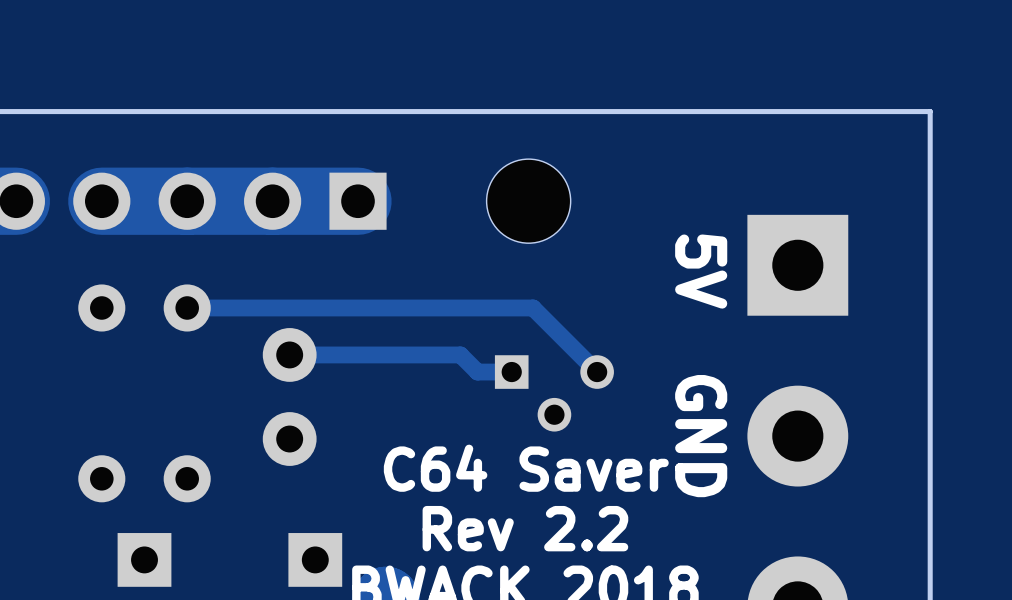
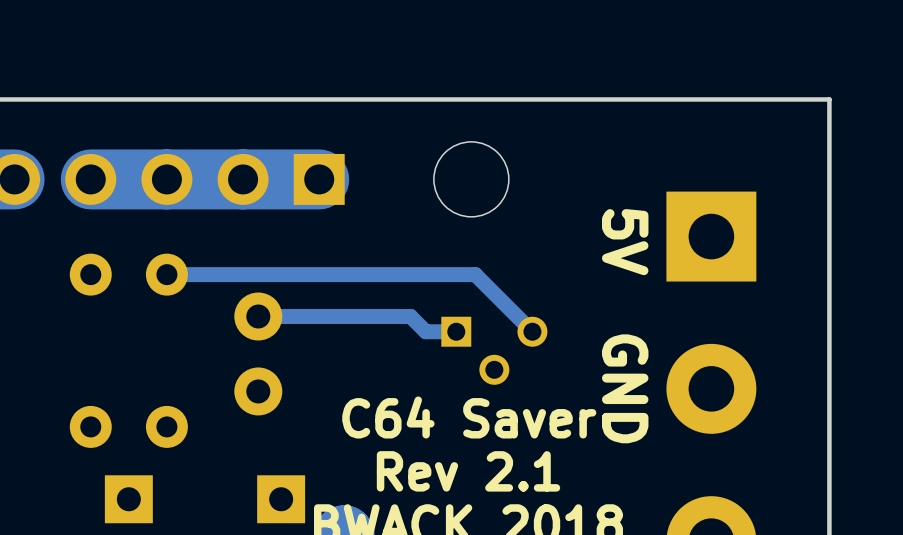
text: Rev 2.2 (525, 528) -> Rev 2.1 (468, 471)

